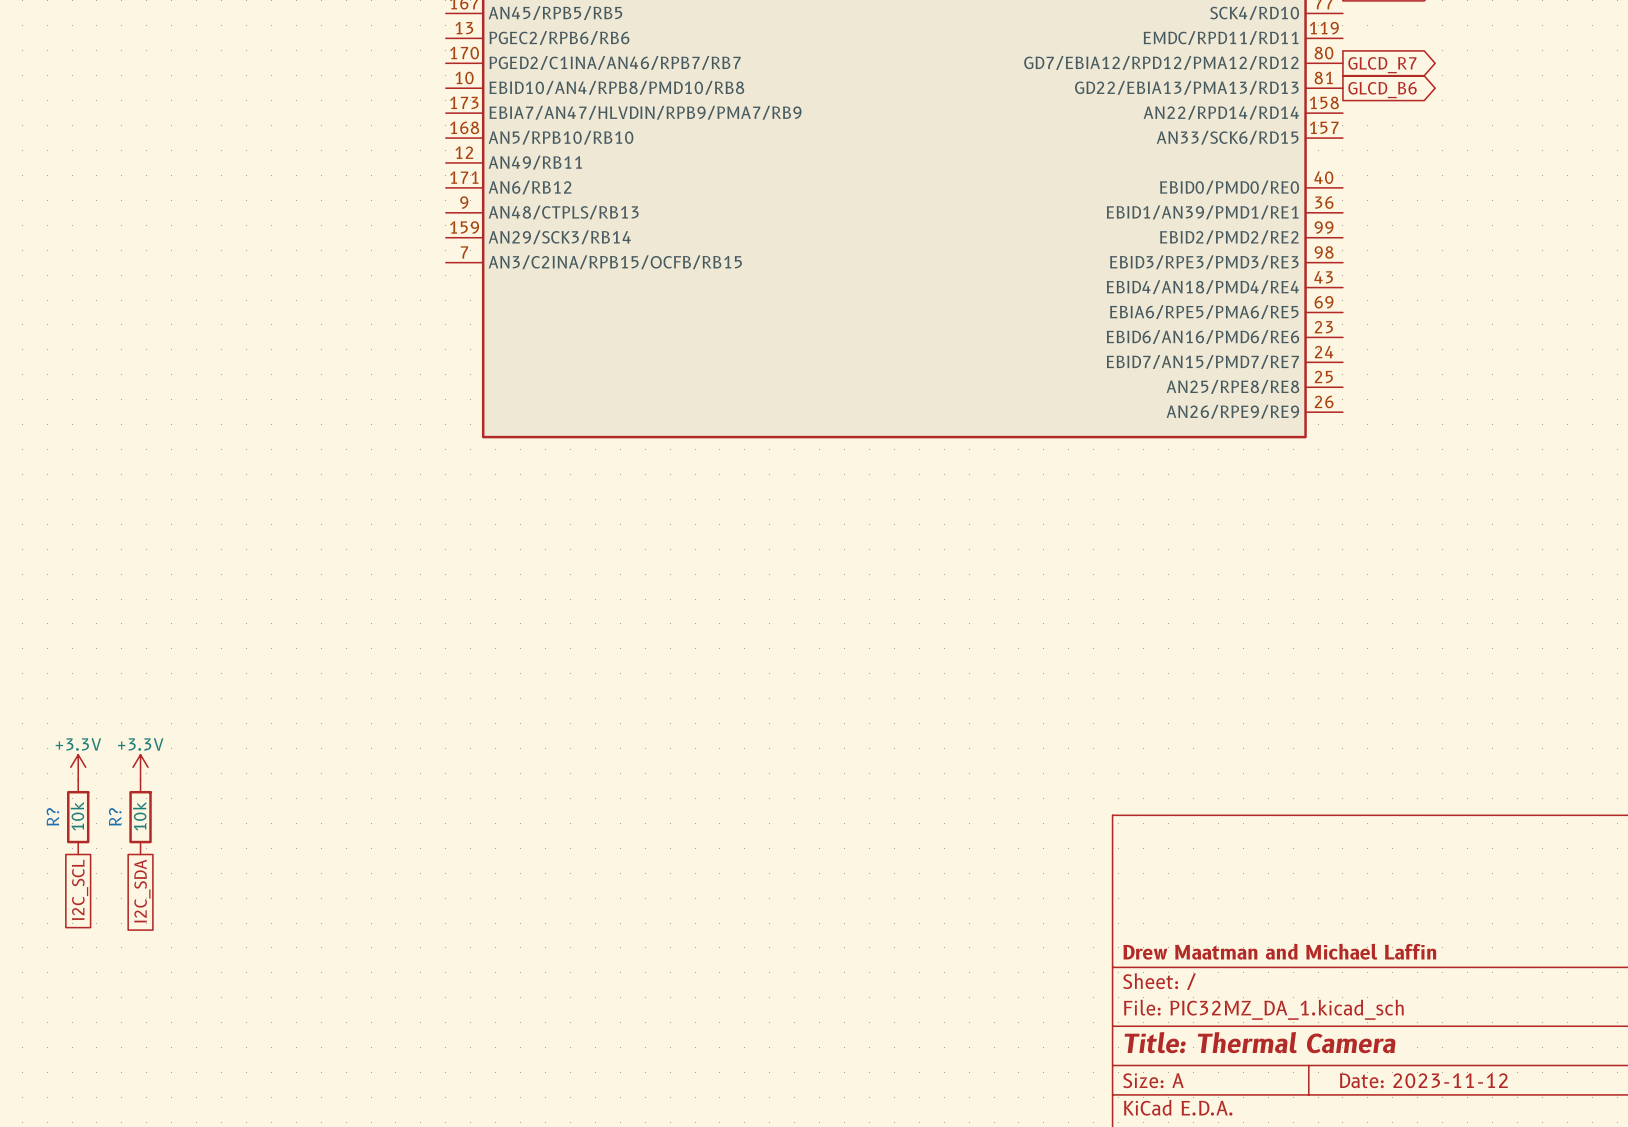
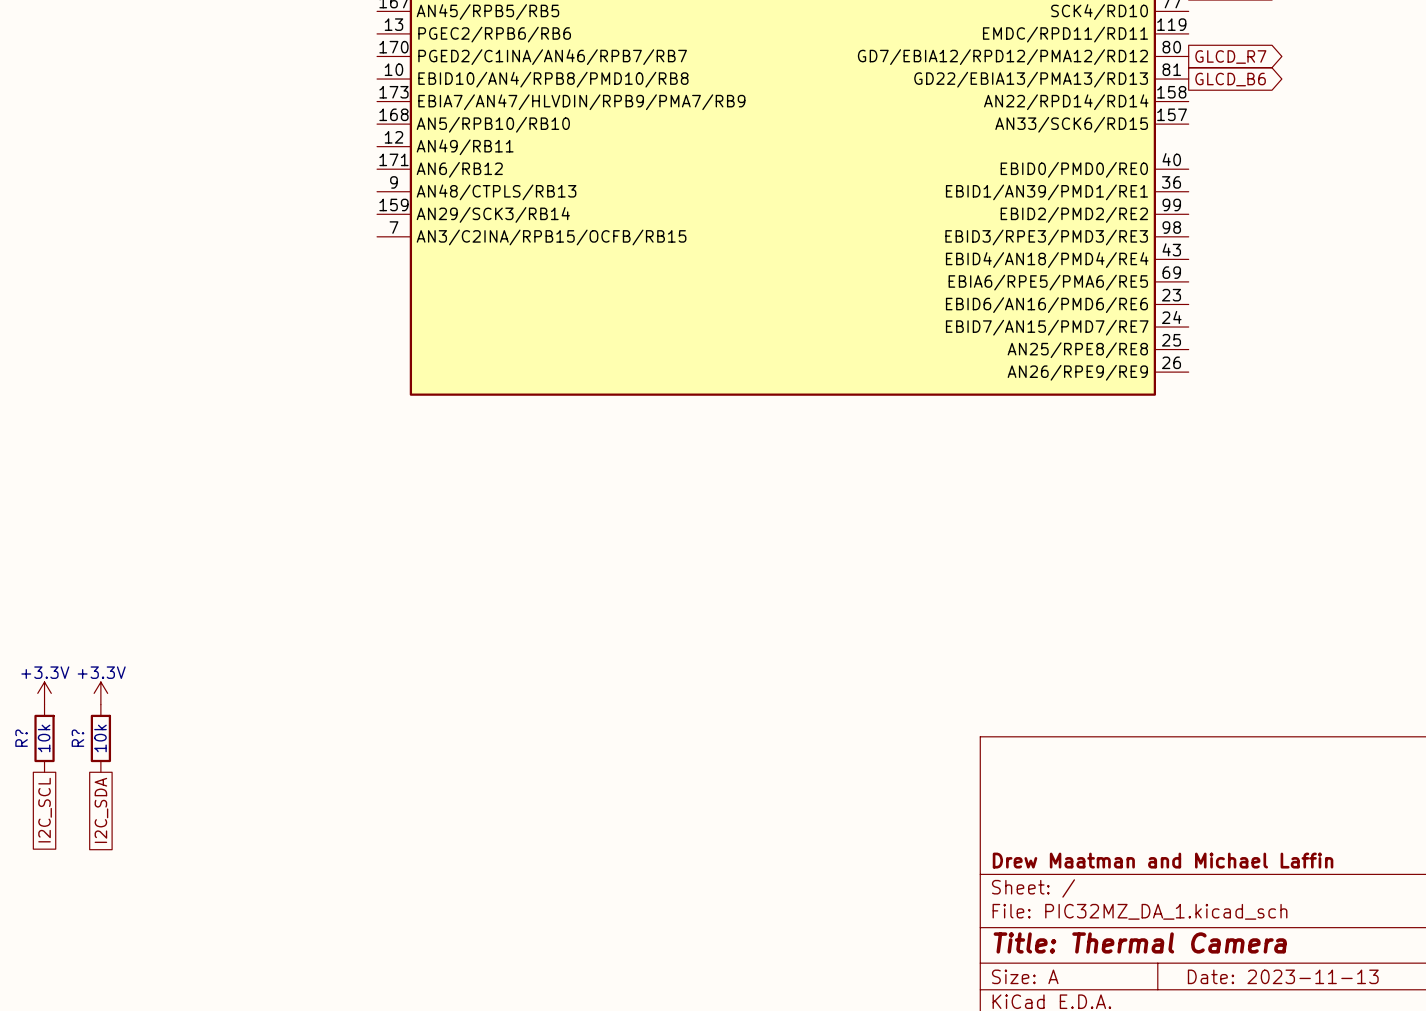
title block: Date: 2023-11-12 (1423, 1080) -> Date: 2023-11-13 (1283, 976)

